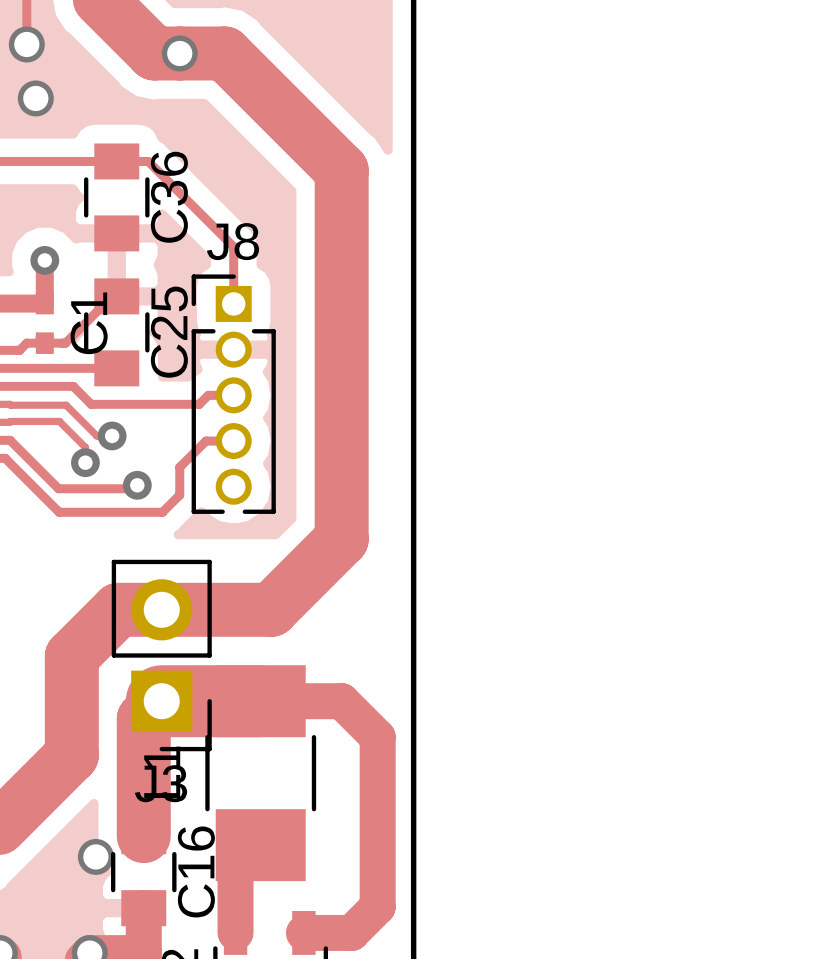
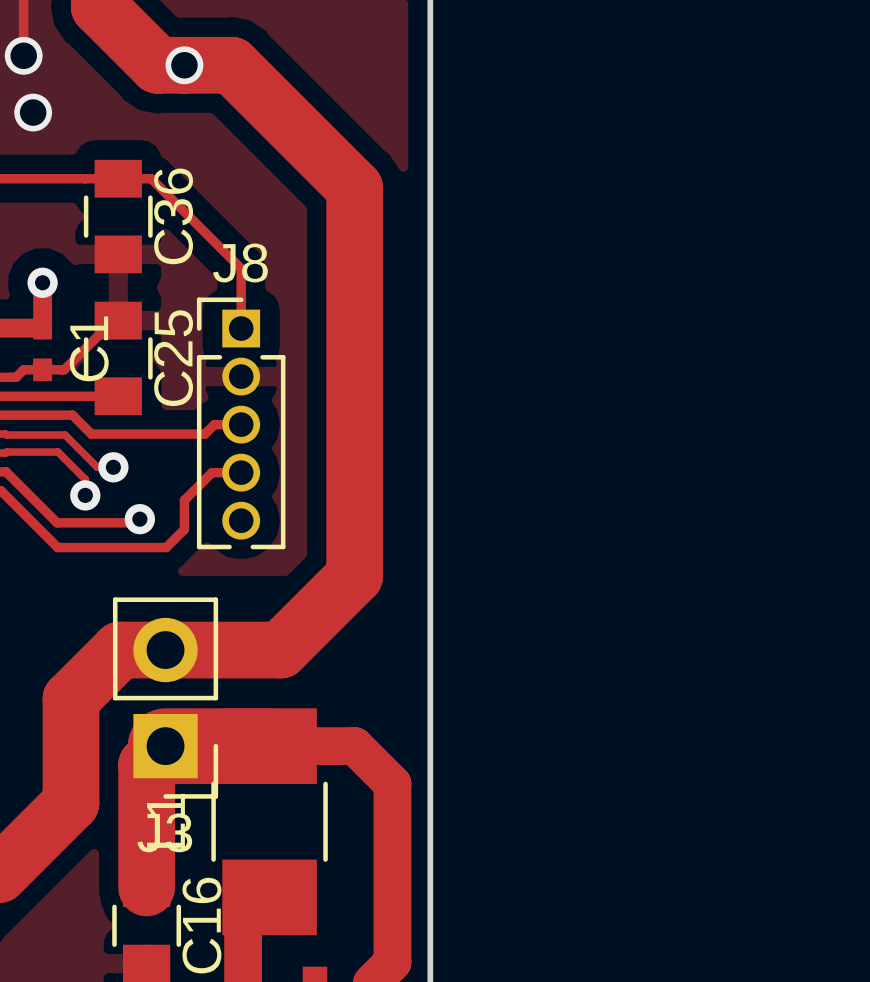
via: (95, 856) -> none

